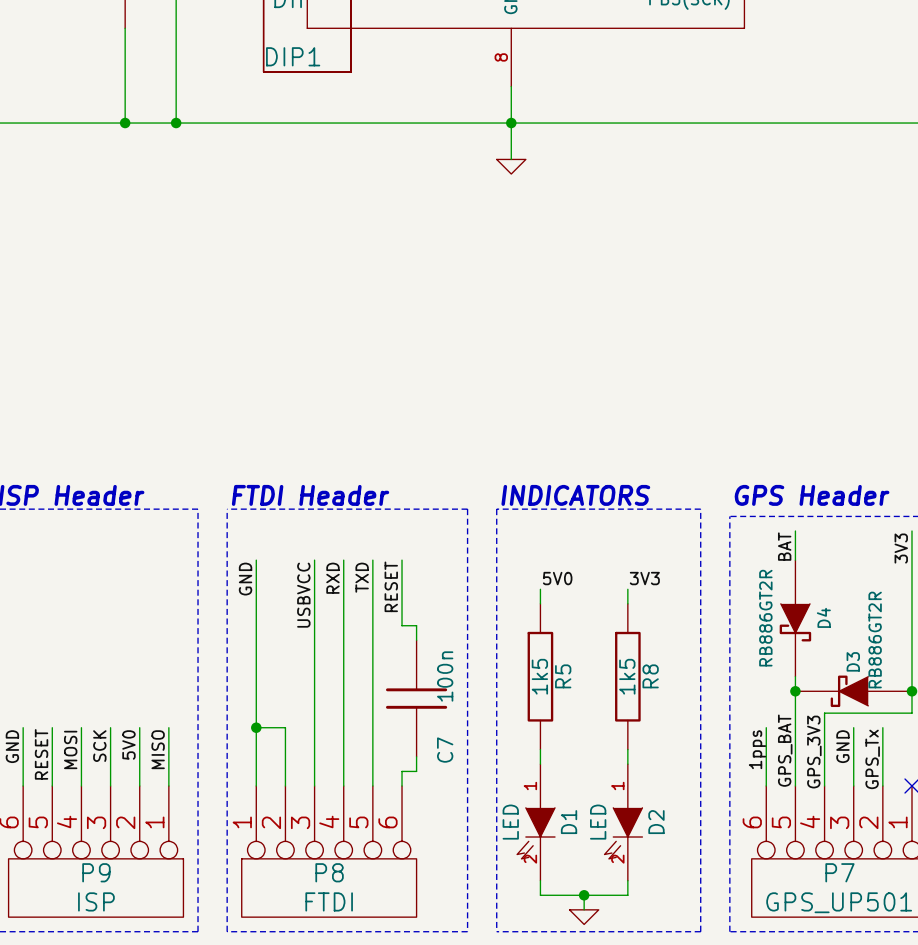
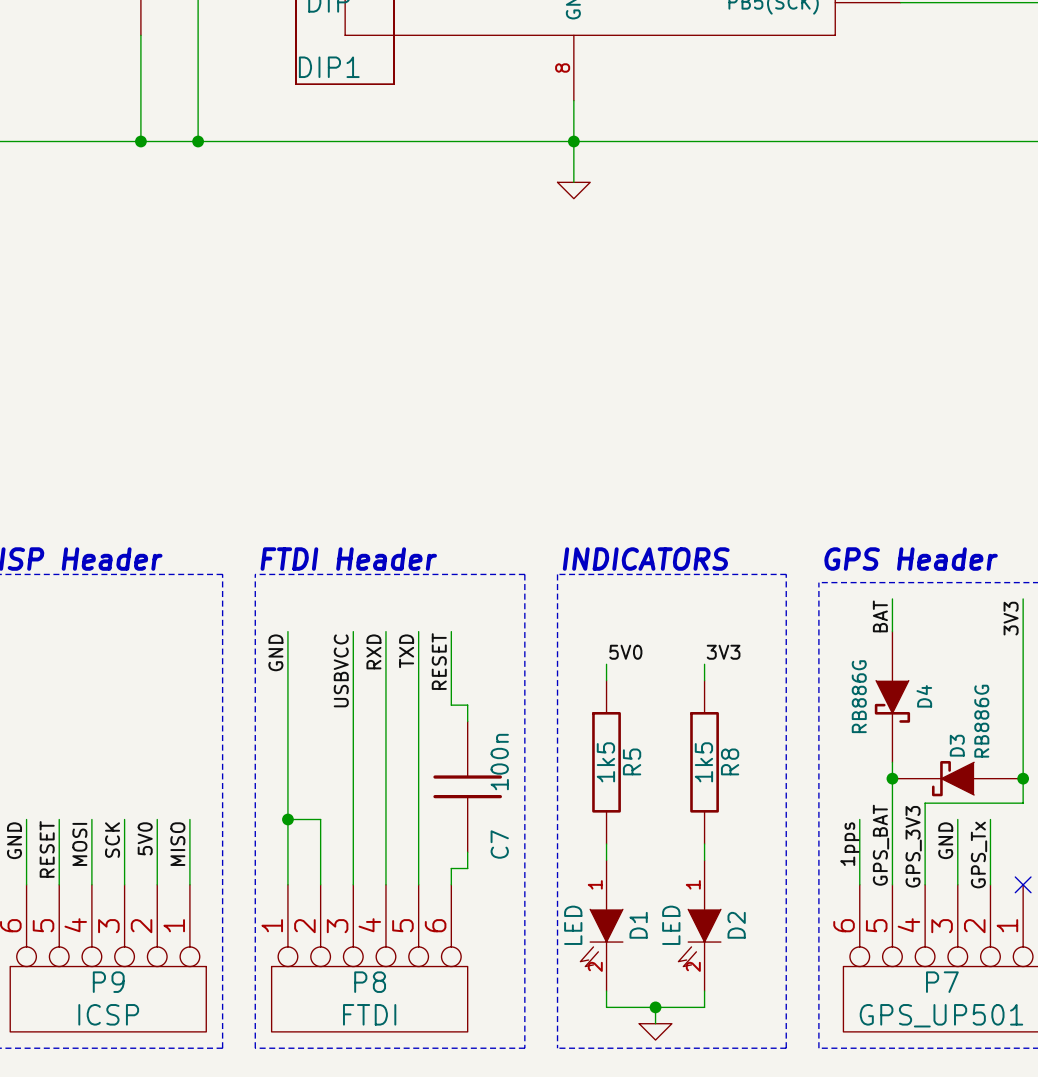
D4 value: RB886GT2R (765, 618) -> RB886G (859, 696)
D3 value: RB886GT2R (875, 640) -> RB886G (981, 721)
P9 value: ISP (96, 901) -> ICSP (108, 1014)

